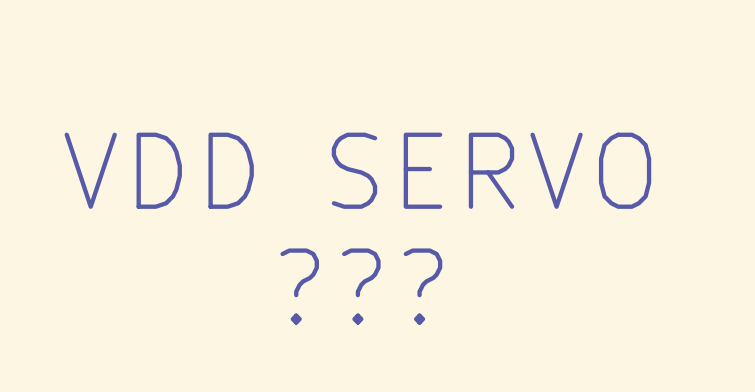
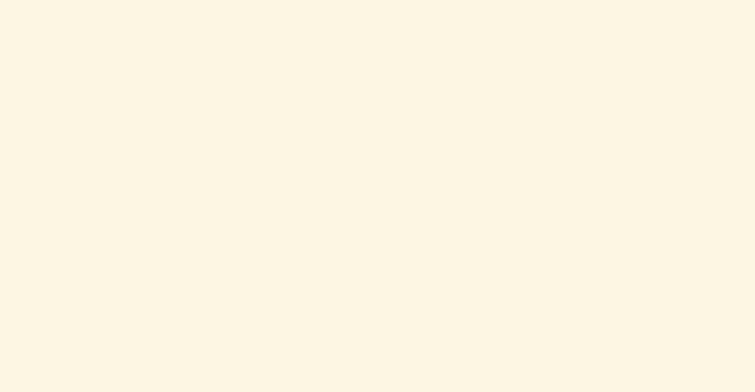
text: VDD SERVO (357, 170) -> none
text: ??? (361, 286) -> none

